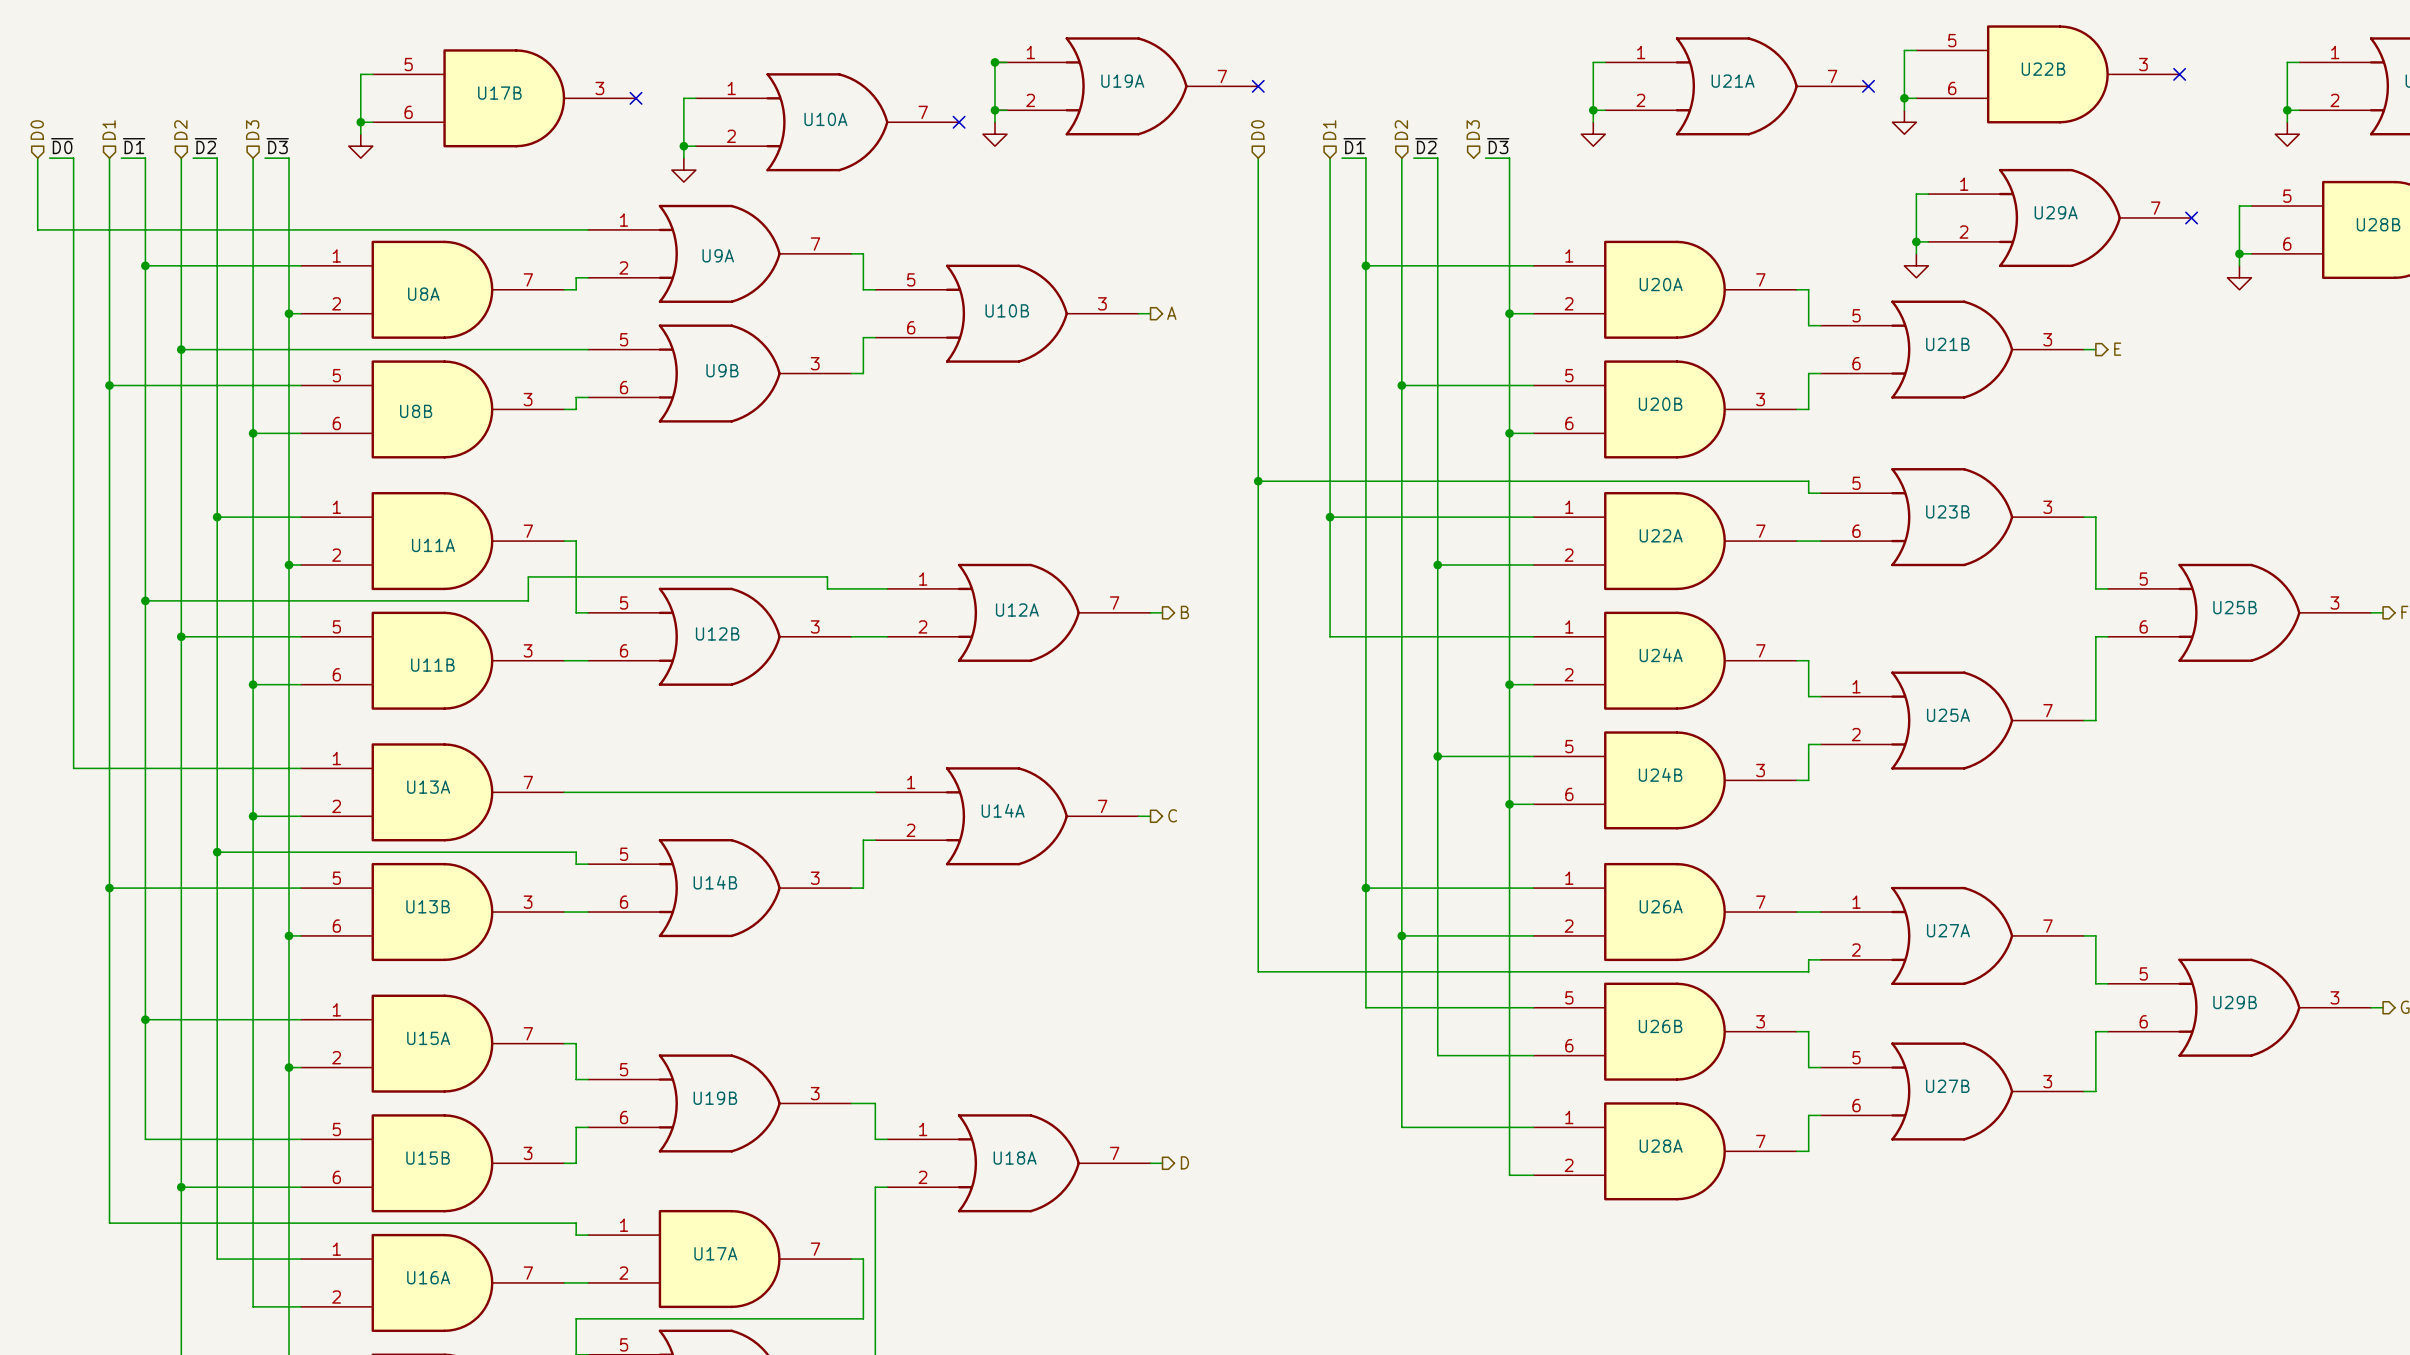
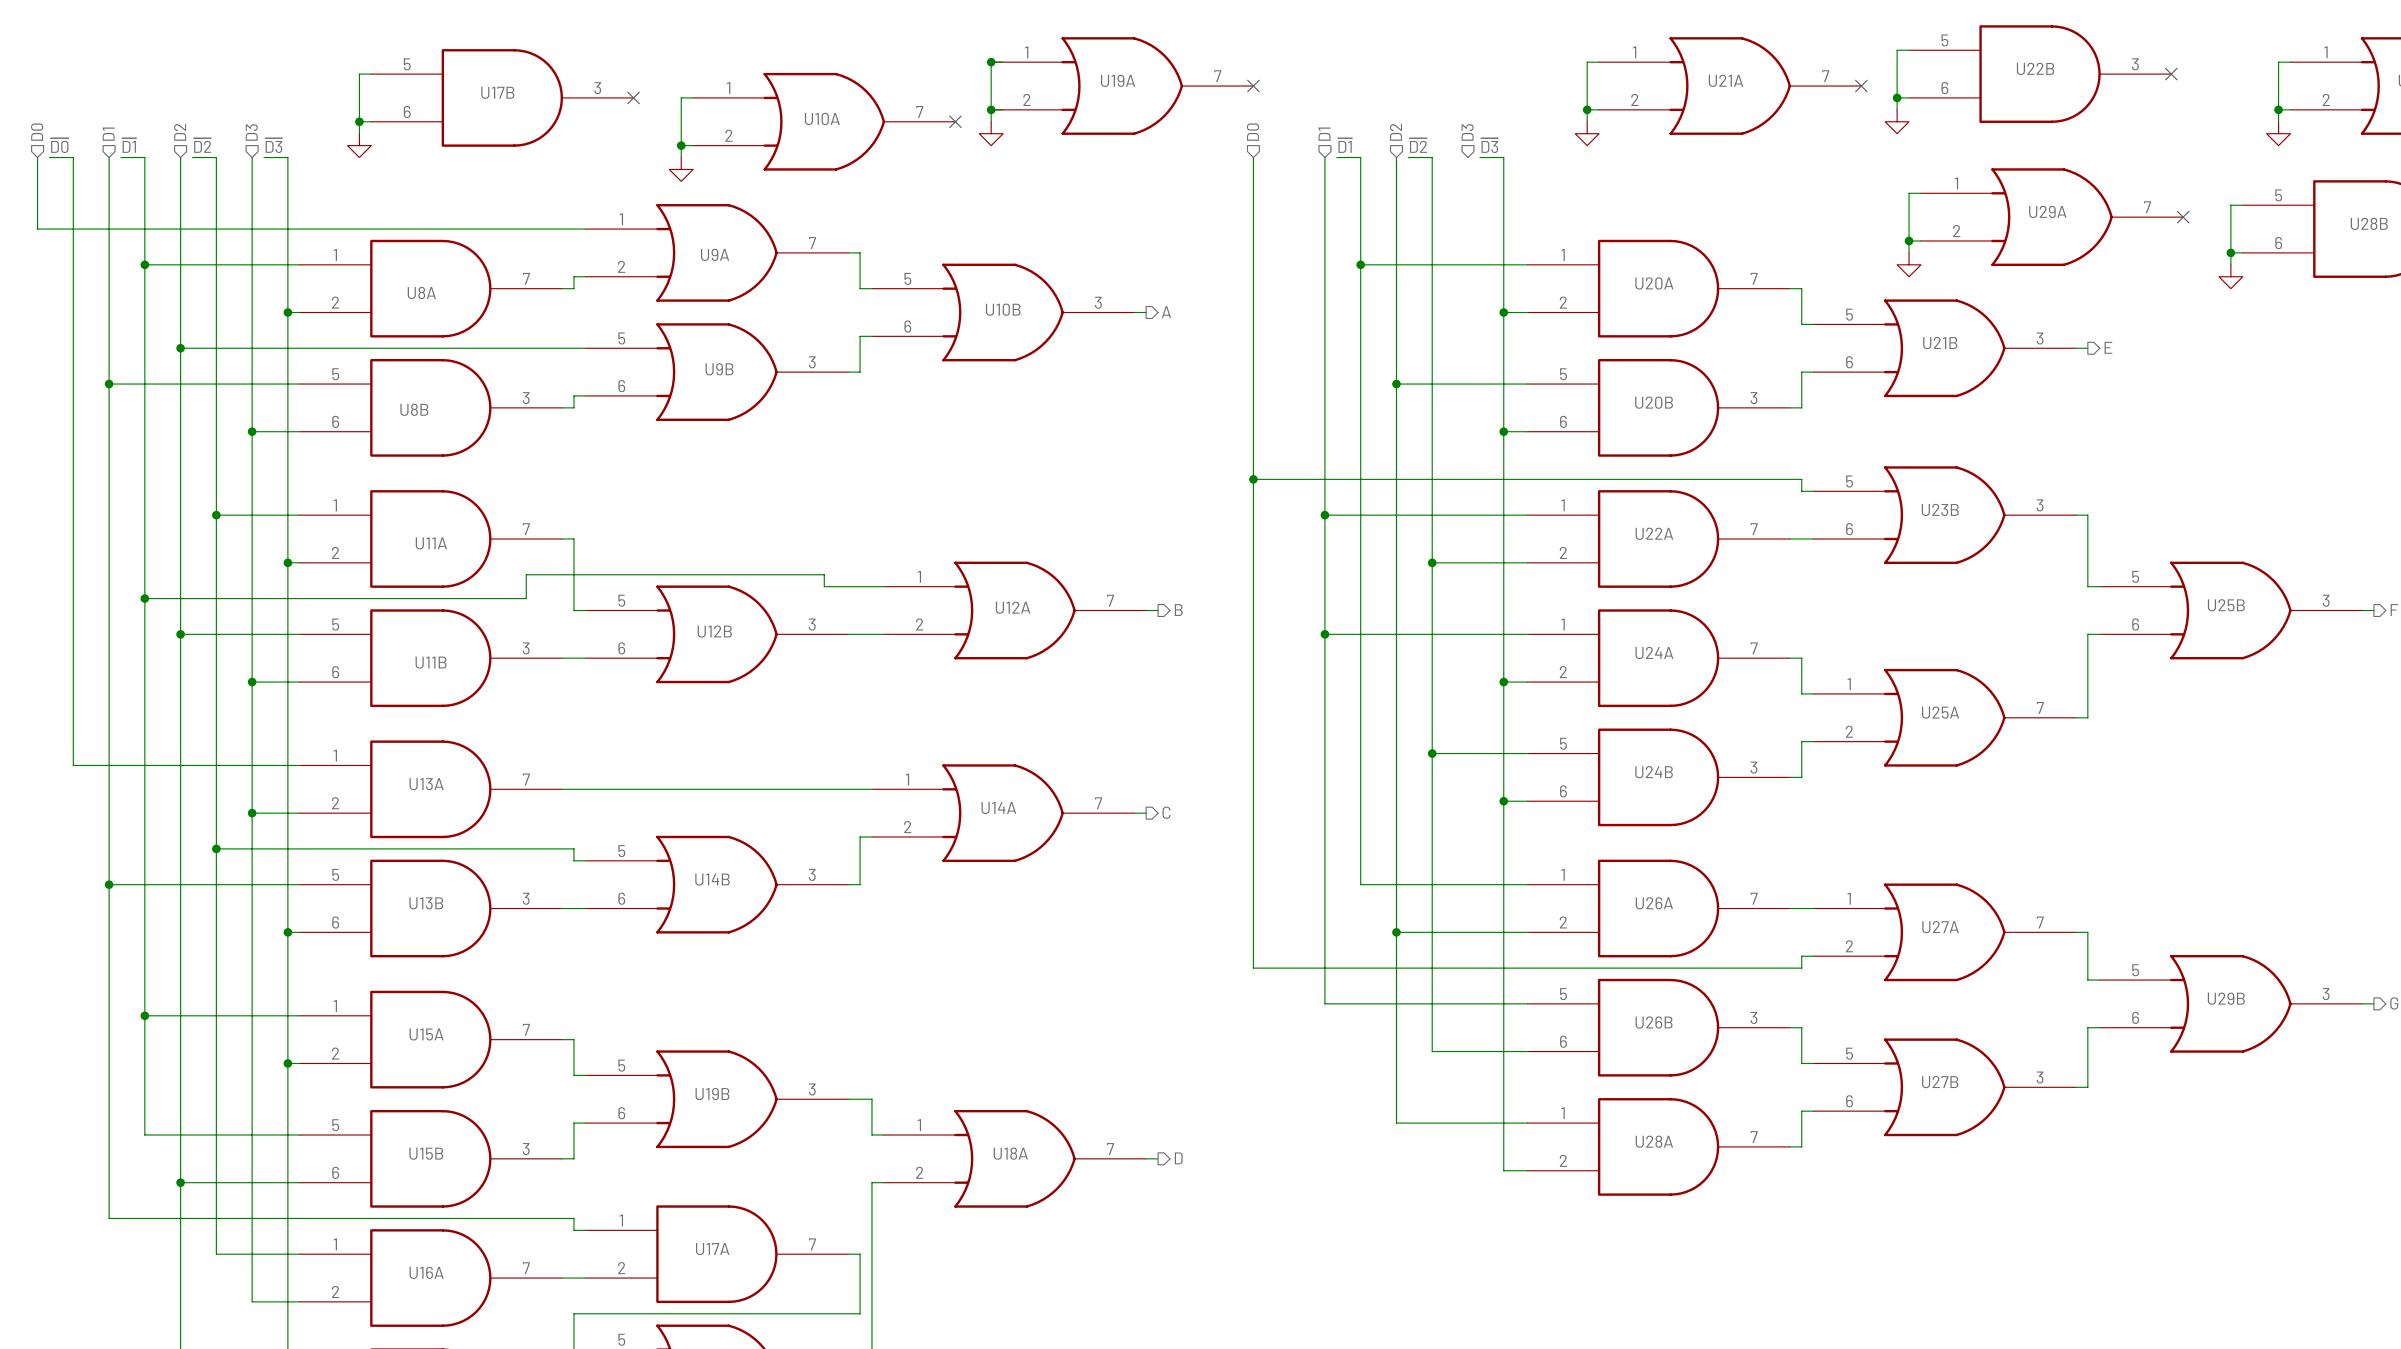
junction: none -> (1324, 634)
wire: (1365, 888) (1365, 1007) -> (1324, 634) (1324, 1003) (1360, 1003)
junction: (1365, 888) -> none

